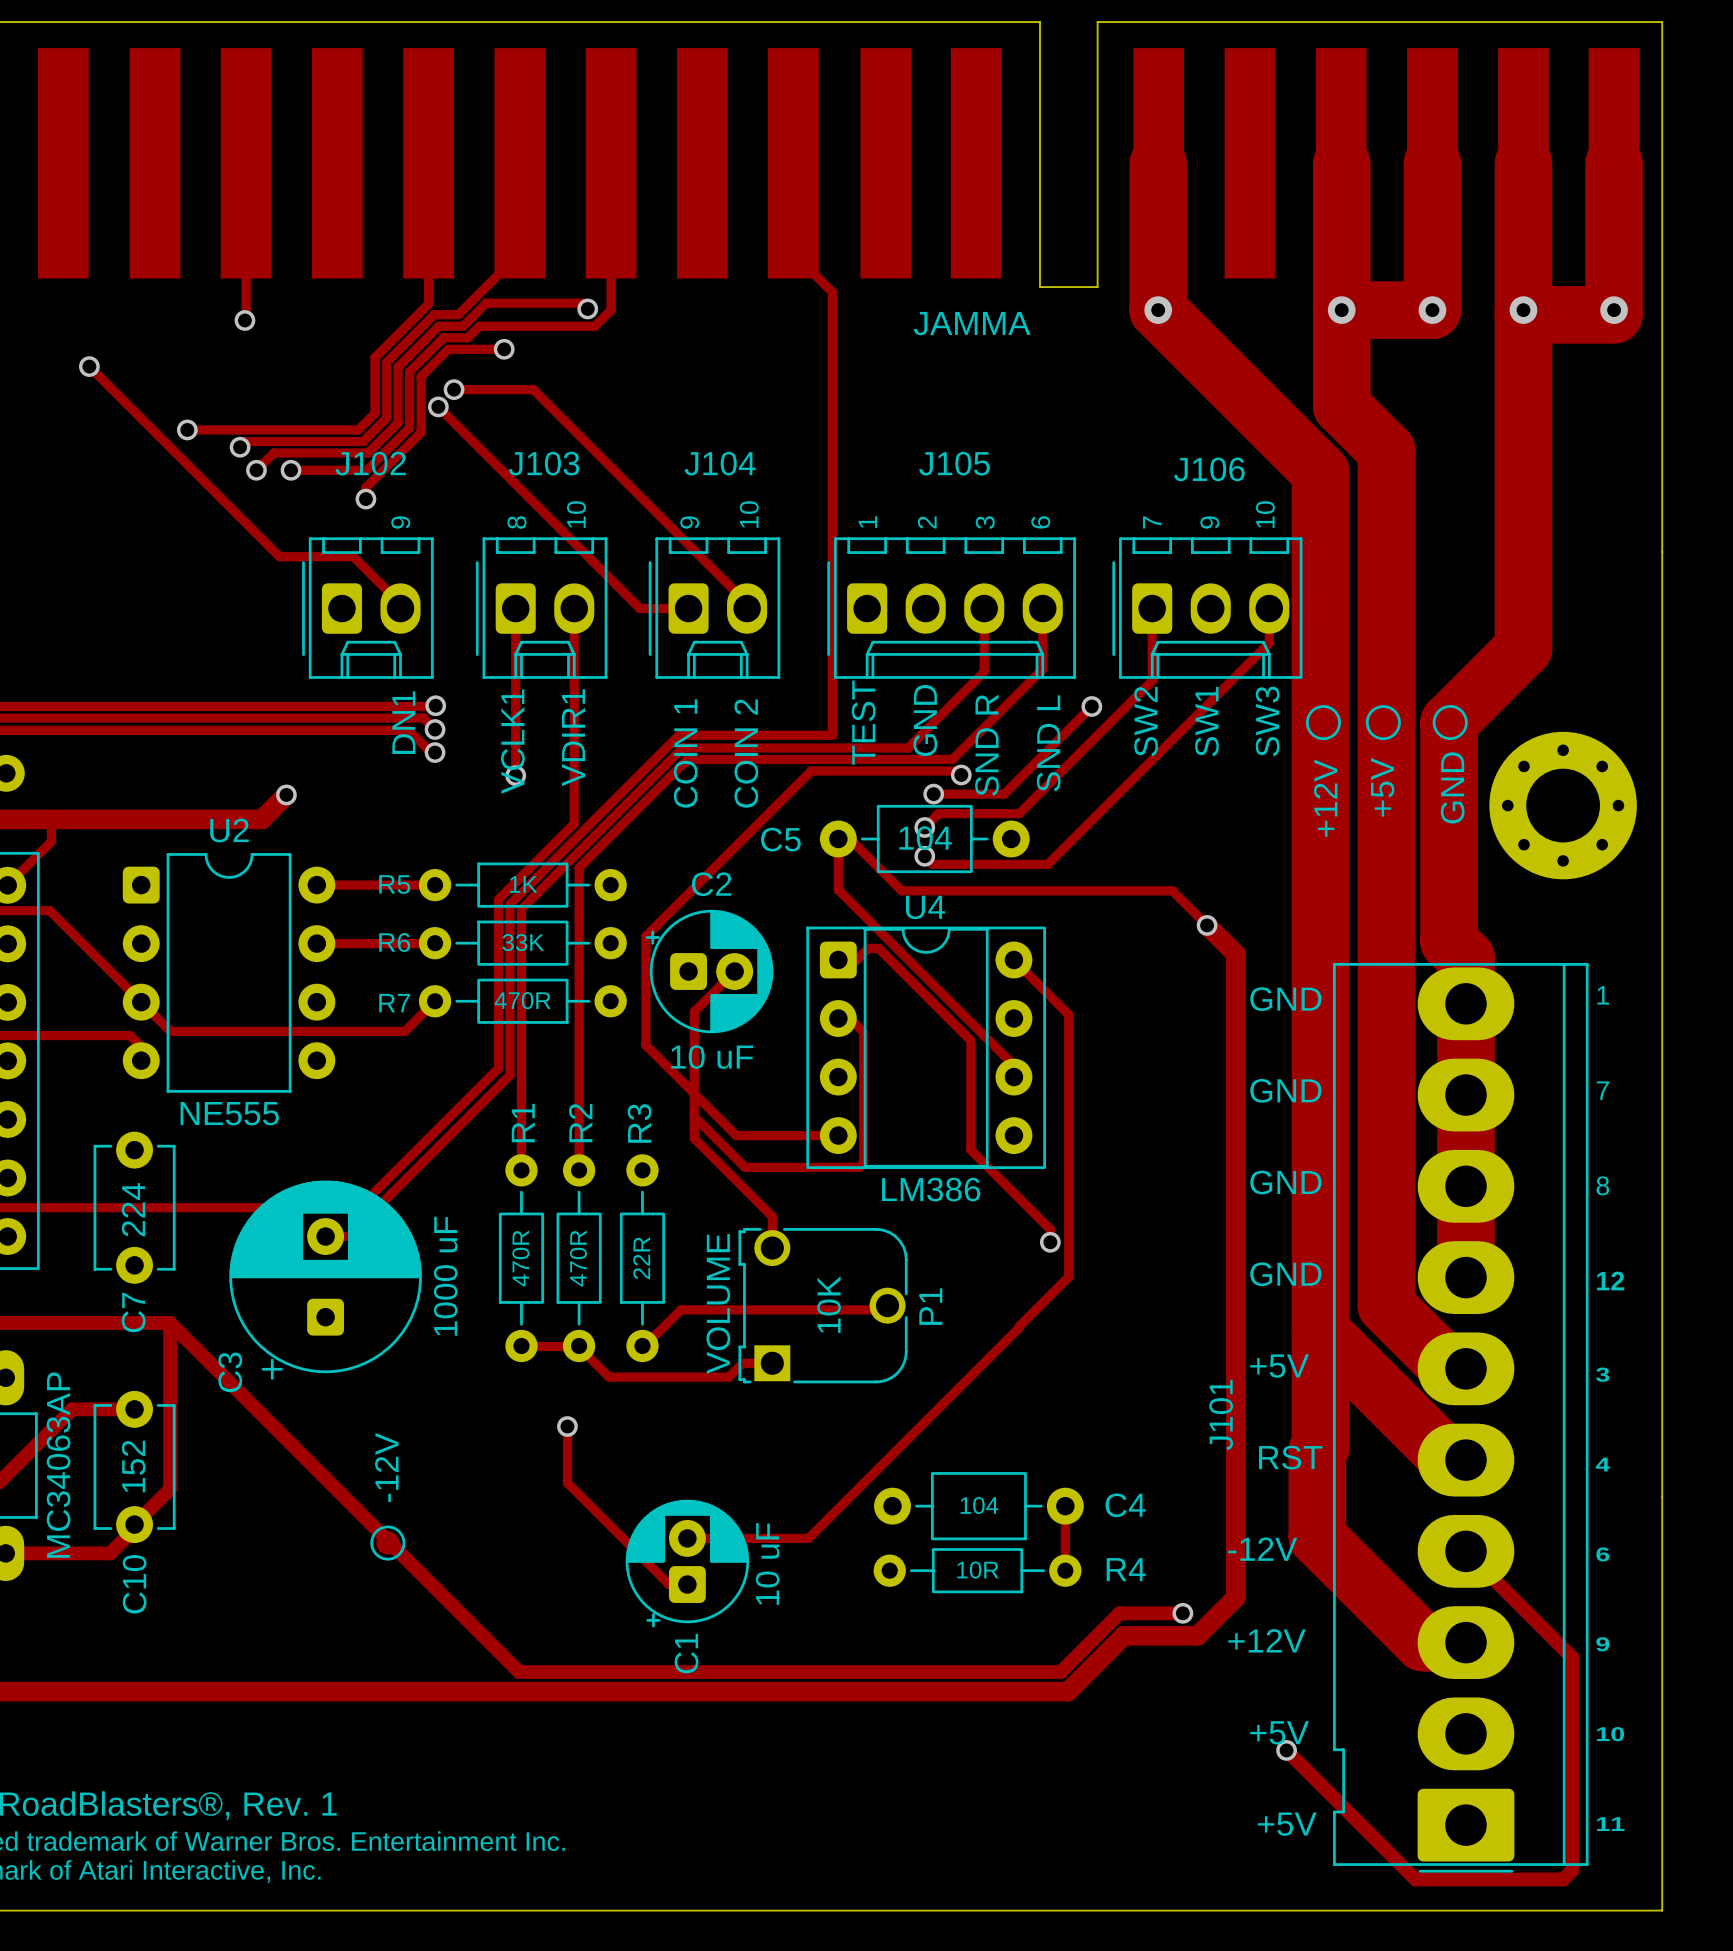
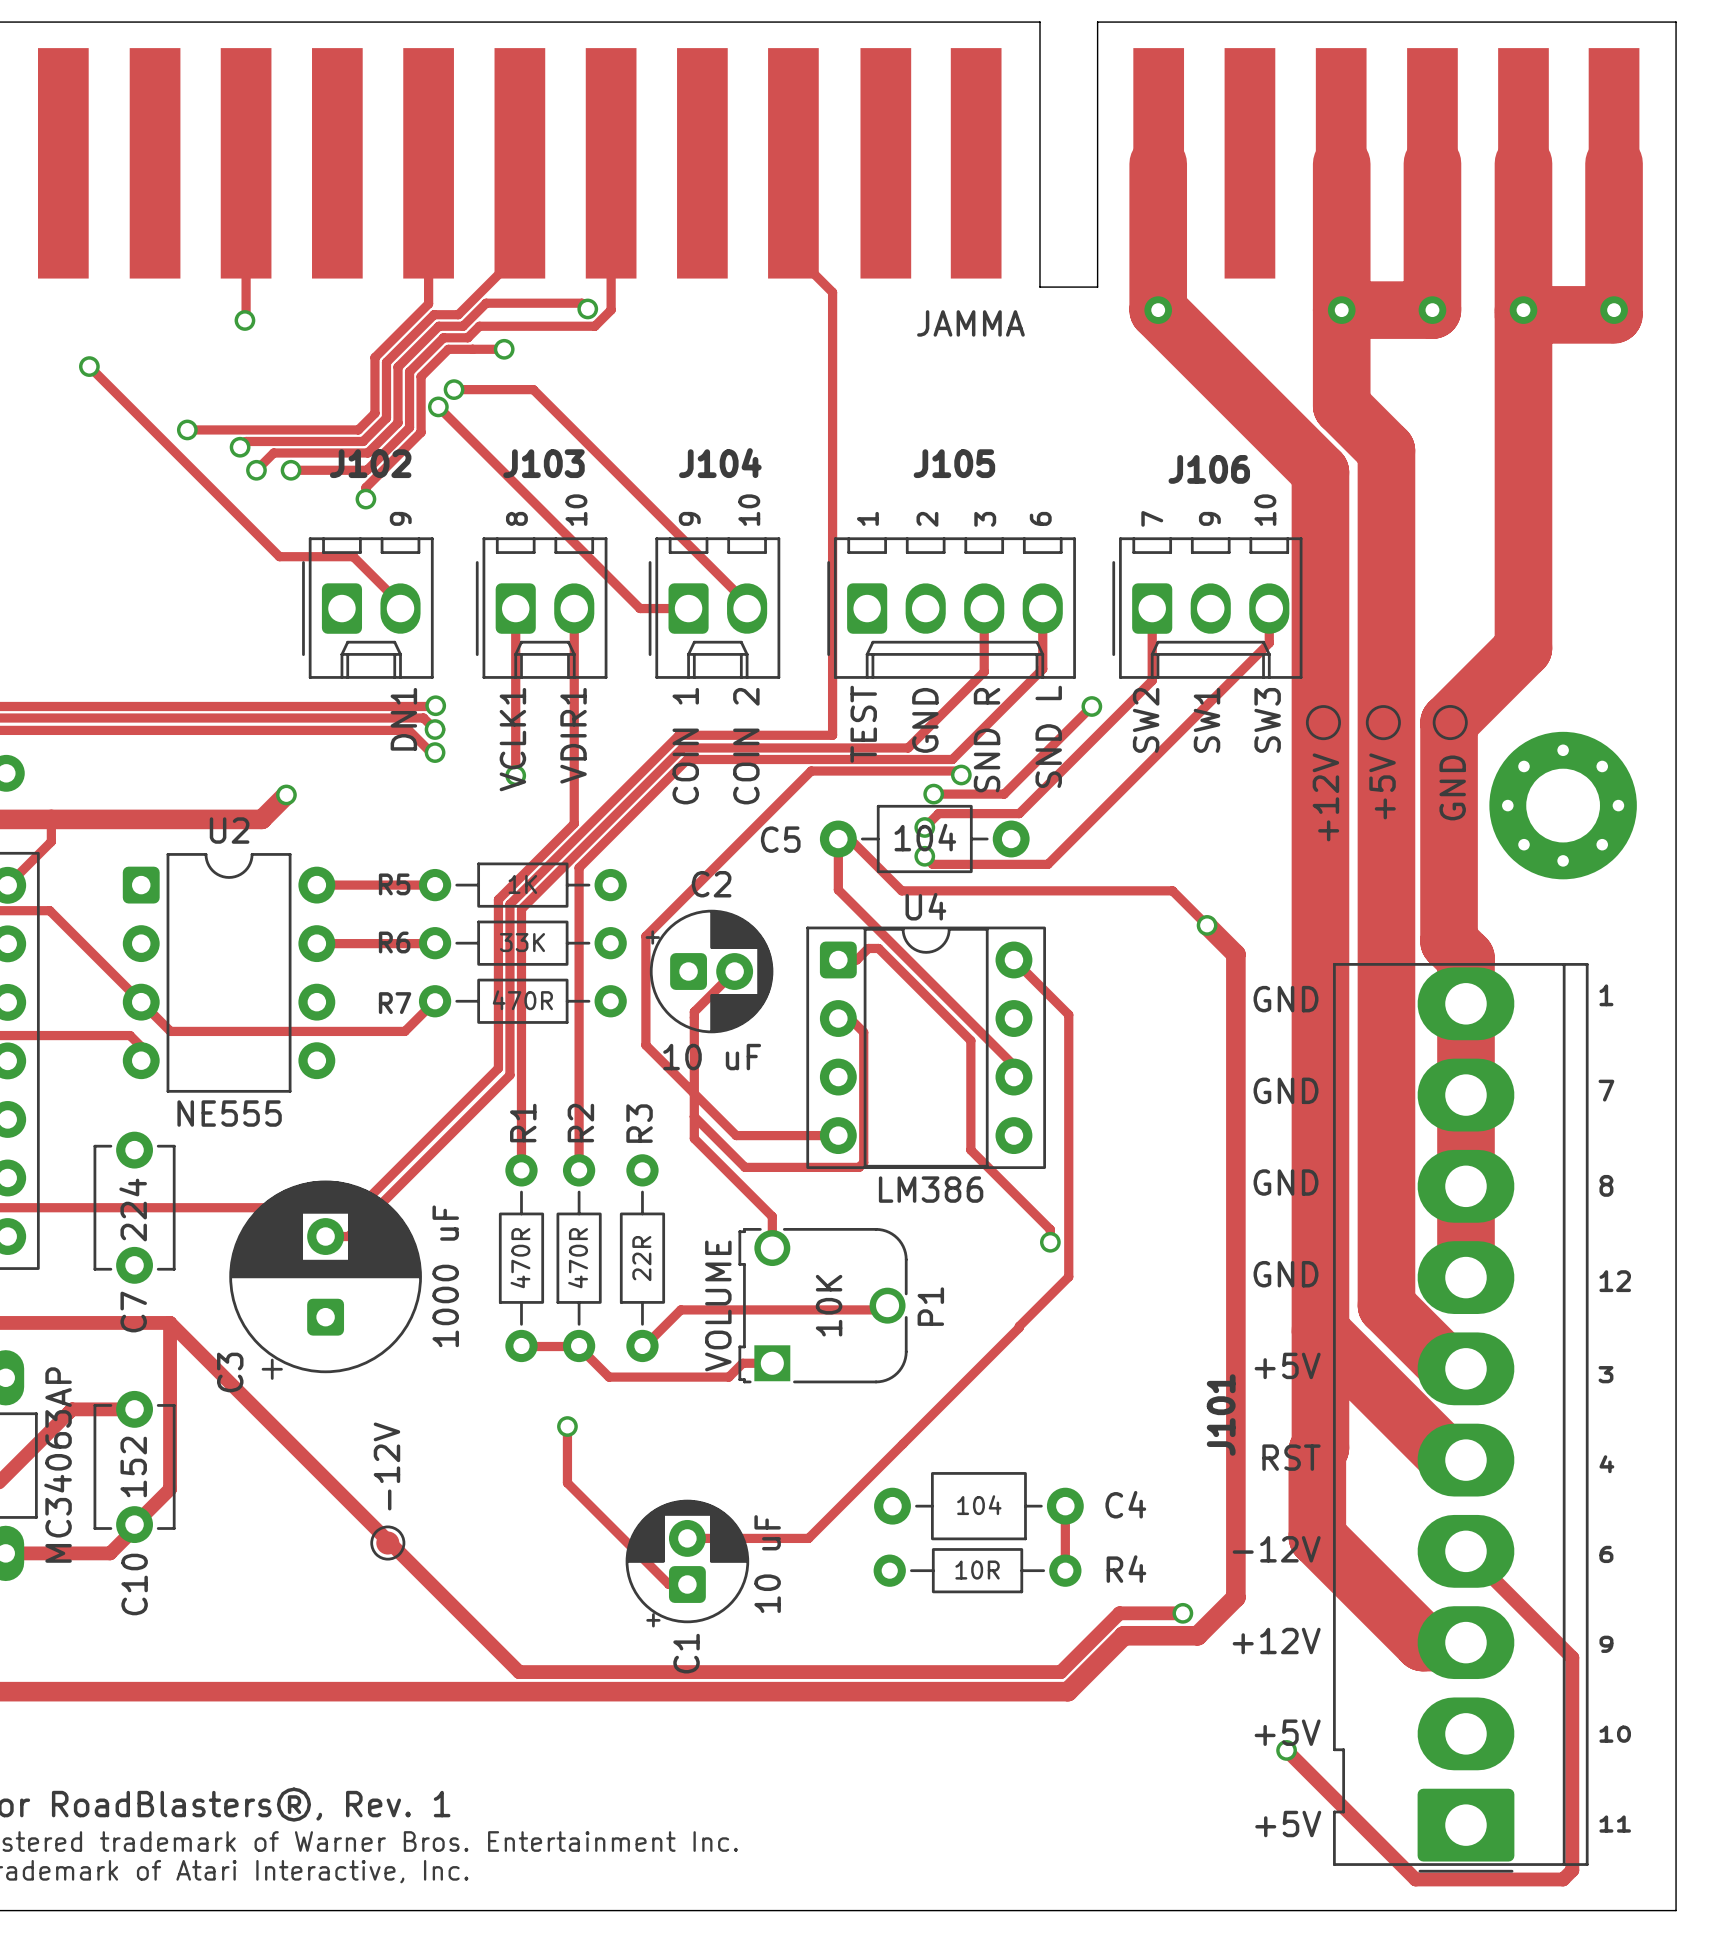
board edge: (1662, 22) (1662, 1910) -> (1662, 22) (1676, 22) (1676, 1910) (1662, 1910)

